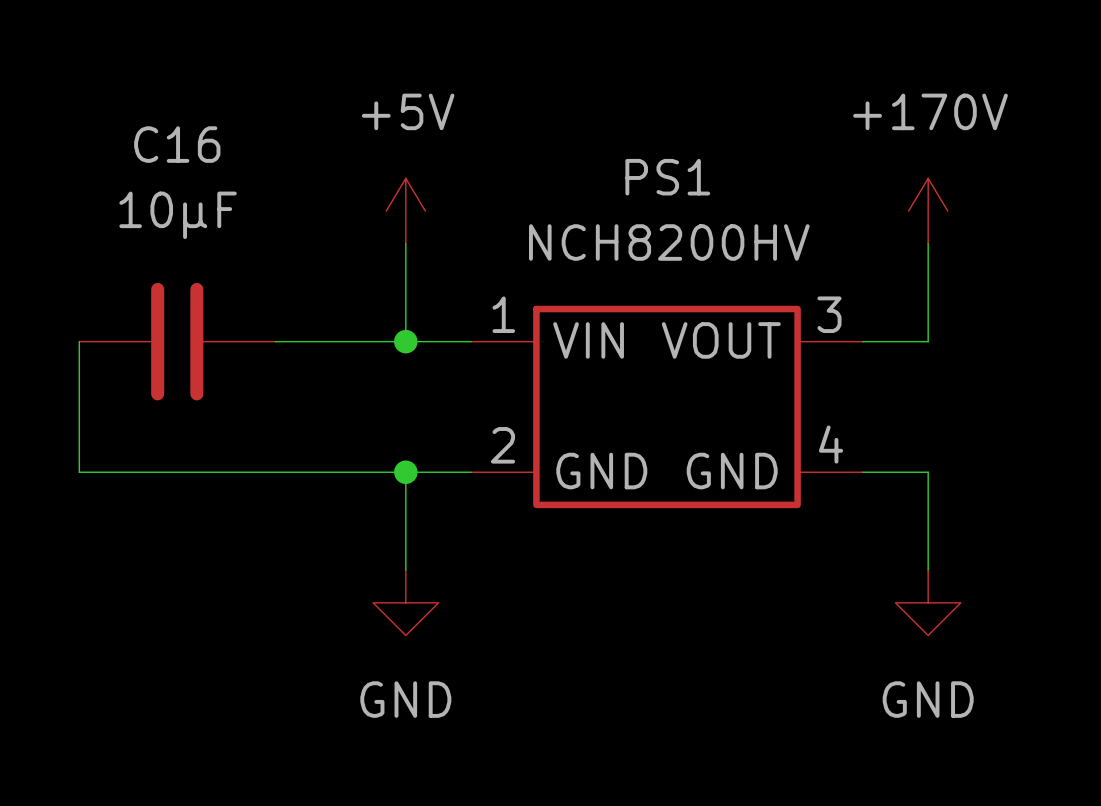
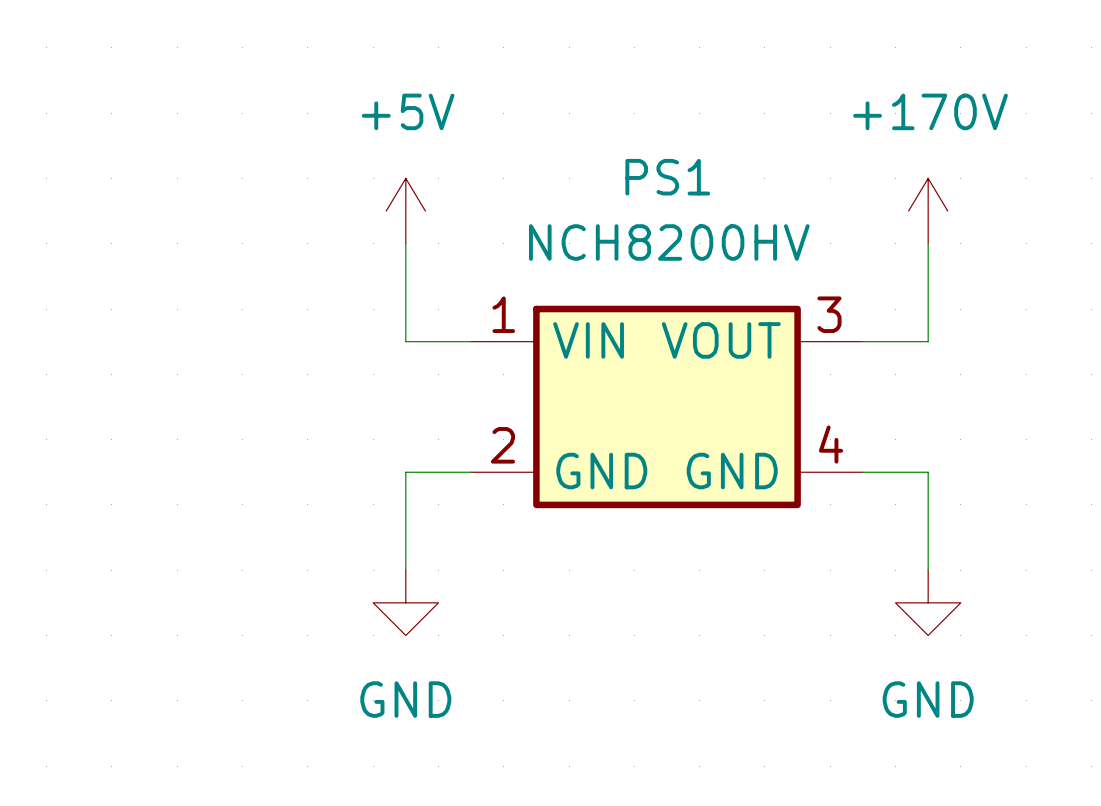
wire: (79, 341) (79, 472) (405, 472) -> none
C16: 10µF (177, 341) -> none
wire: (275, 341) (405, 341) -> none
junction: (405, 341) -> none
junction: (405, 472) -> none

